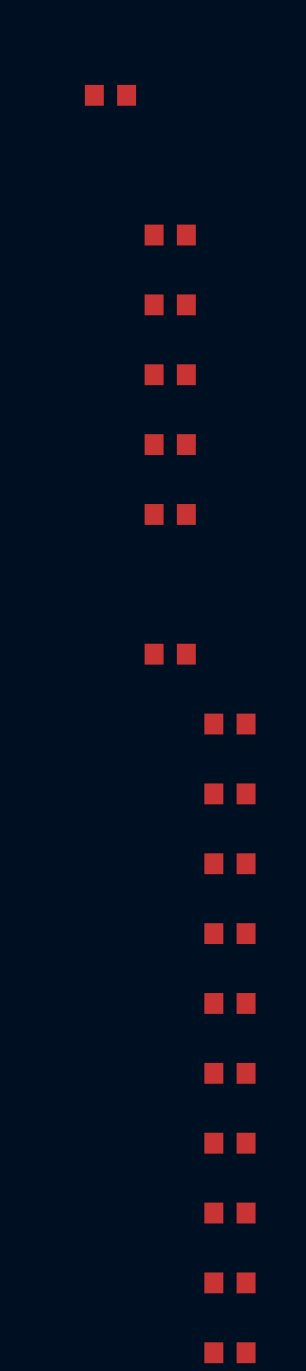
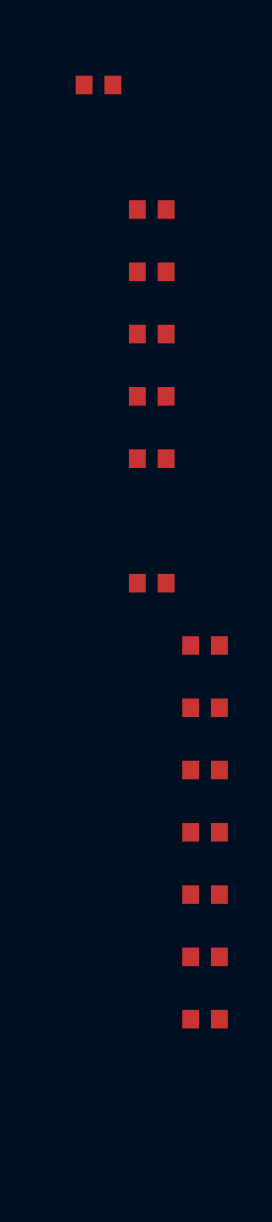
part: (229, 1213) -> none
part: (229, 1282) -> none
part: (229, 1352) -> none

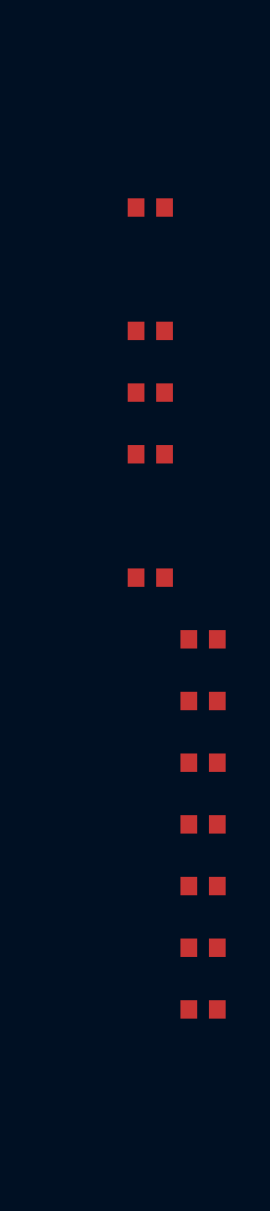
part: (98, 84) -> none
part: (151, 271) -> none

